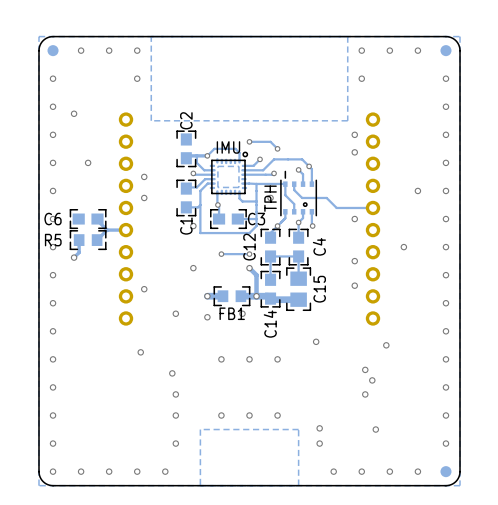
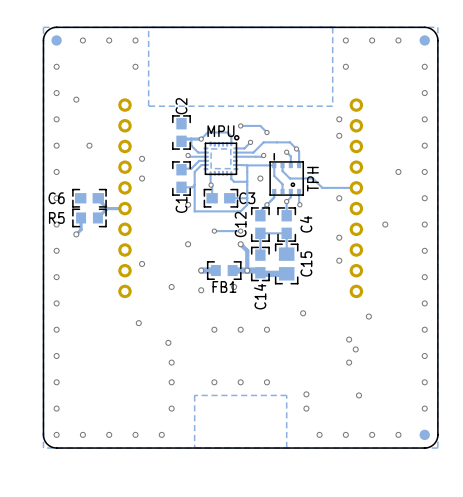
IMU name: IMU (228, 147) -> MPU (220, 131)
TPH footprint: [280, 170, 318, 217] -> [269, 153, 304, 196]
TPH name position: TPH (270, 198) -> TPH (312, 179)

